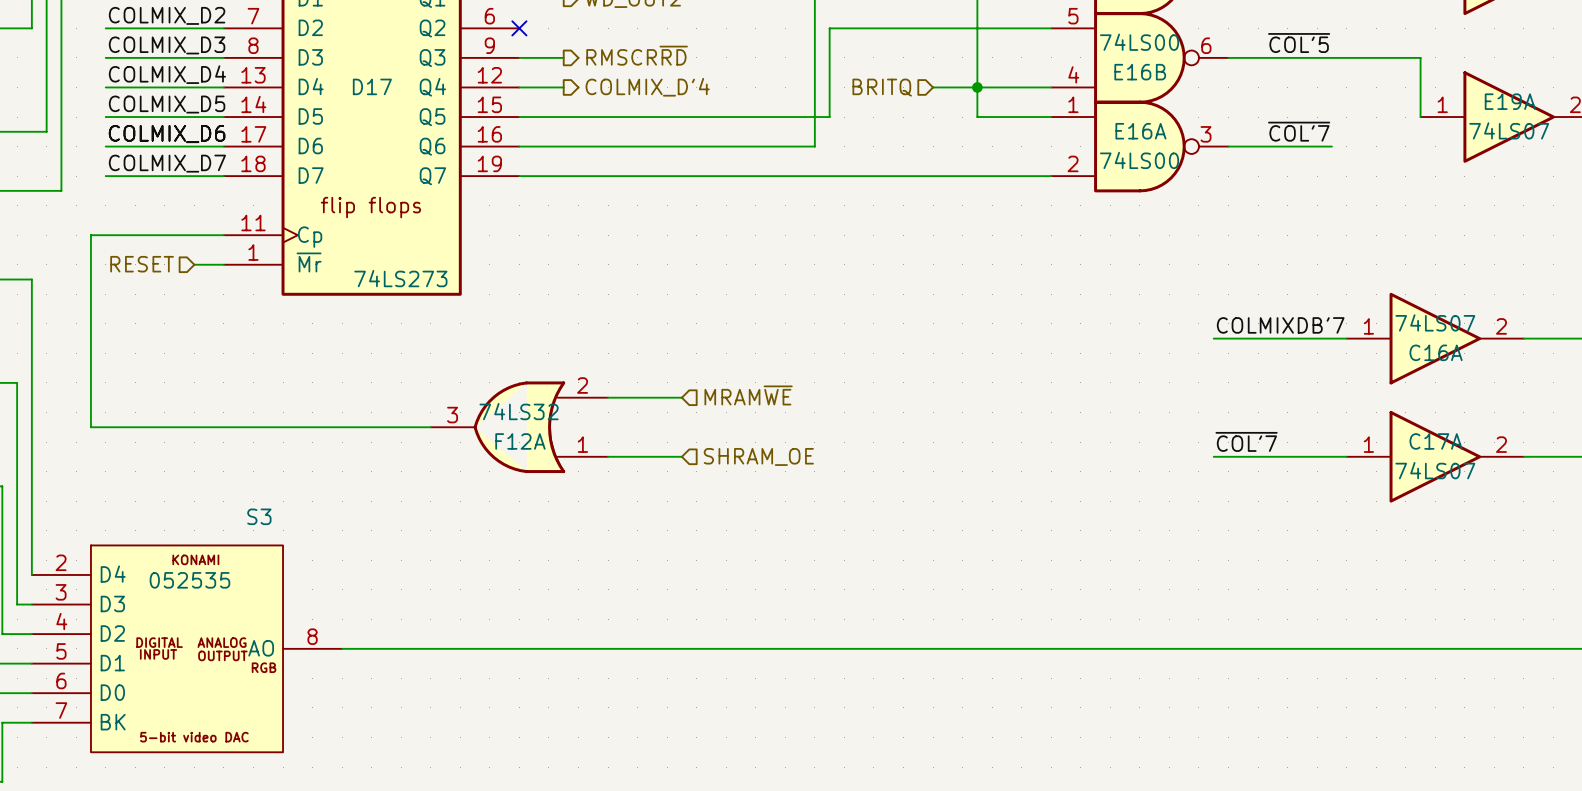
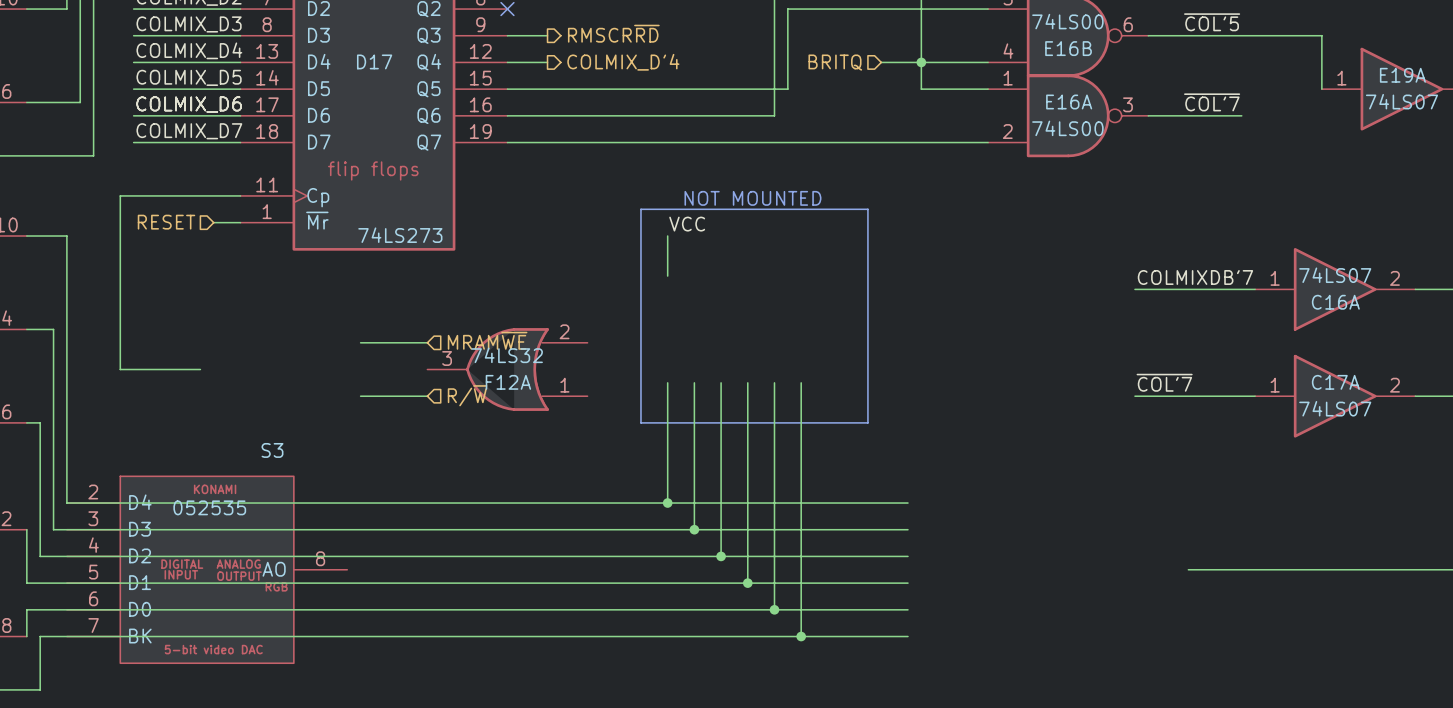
text: none -> NOT MOUNTED (752, 198)
line: none -> (640, 209) (640, 422) (867, 422) (867, 209) (640, 209)
label: none -> VCC (687, 224)
wire: none -> (667, 236) (667, 276)
hierarchical label position: MRAM~{WE} (748, 395) -> MRAM~{WE} (487, 340)
wire: (608, 397) (681, 397) -> (360, 342) (427, 342)
wire: (179, 427) (430, 427) -> none
wire: none -> (667, 382) (667, 503)
wire: none -> (694, 382) (694, 529)
wire: none -> (721, 382) (721, 556)
wire: none -> (747, 382) (747, 583)
wire: none -> (774, 382) (774, 609)
wire: none -> (801, 382) (801, 636)
hierarchical label: none -> R/~{W} (467, 395)
wire: (608, 456) (681, 456) -> (360, 396) (427, 396)
hierarchical label: SHRAM_OE (758, 456) -> none
wire: none -> (66, 503) (907, 503)
junction: none -> (667, 503)
wire: none -> (66, 529) (907, 529)
junction: none -> (694, 529)
wire: none -> (66, 556) (907, 556)
junction: none -> (721, 556)
wire: (342, 648) (1272, 648) -> none
wire: none -> (66, 583) (907, 583)
junction: none -> (747, 583)
wire: none -> (66, 609) (907, 609)
junction: none -> (774, 609)
wire: none -> (66, 636) (907, 636)
junction: none -> (801, 636)

